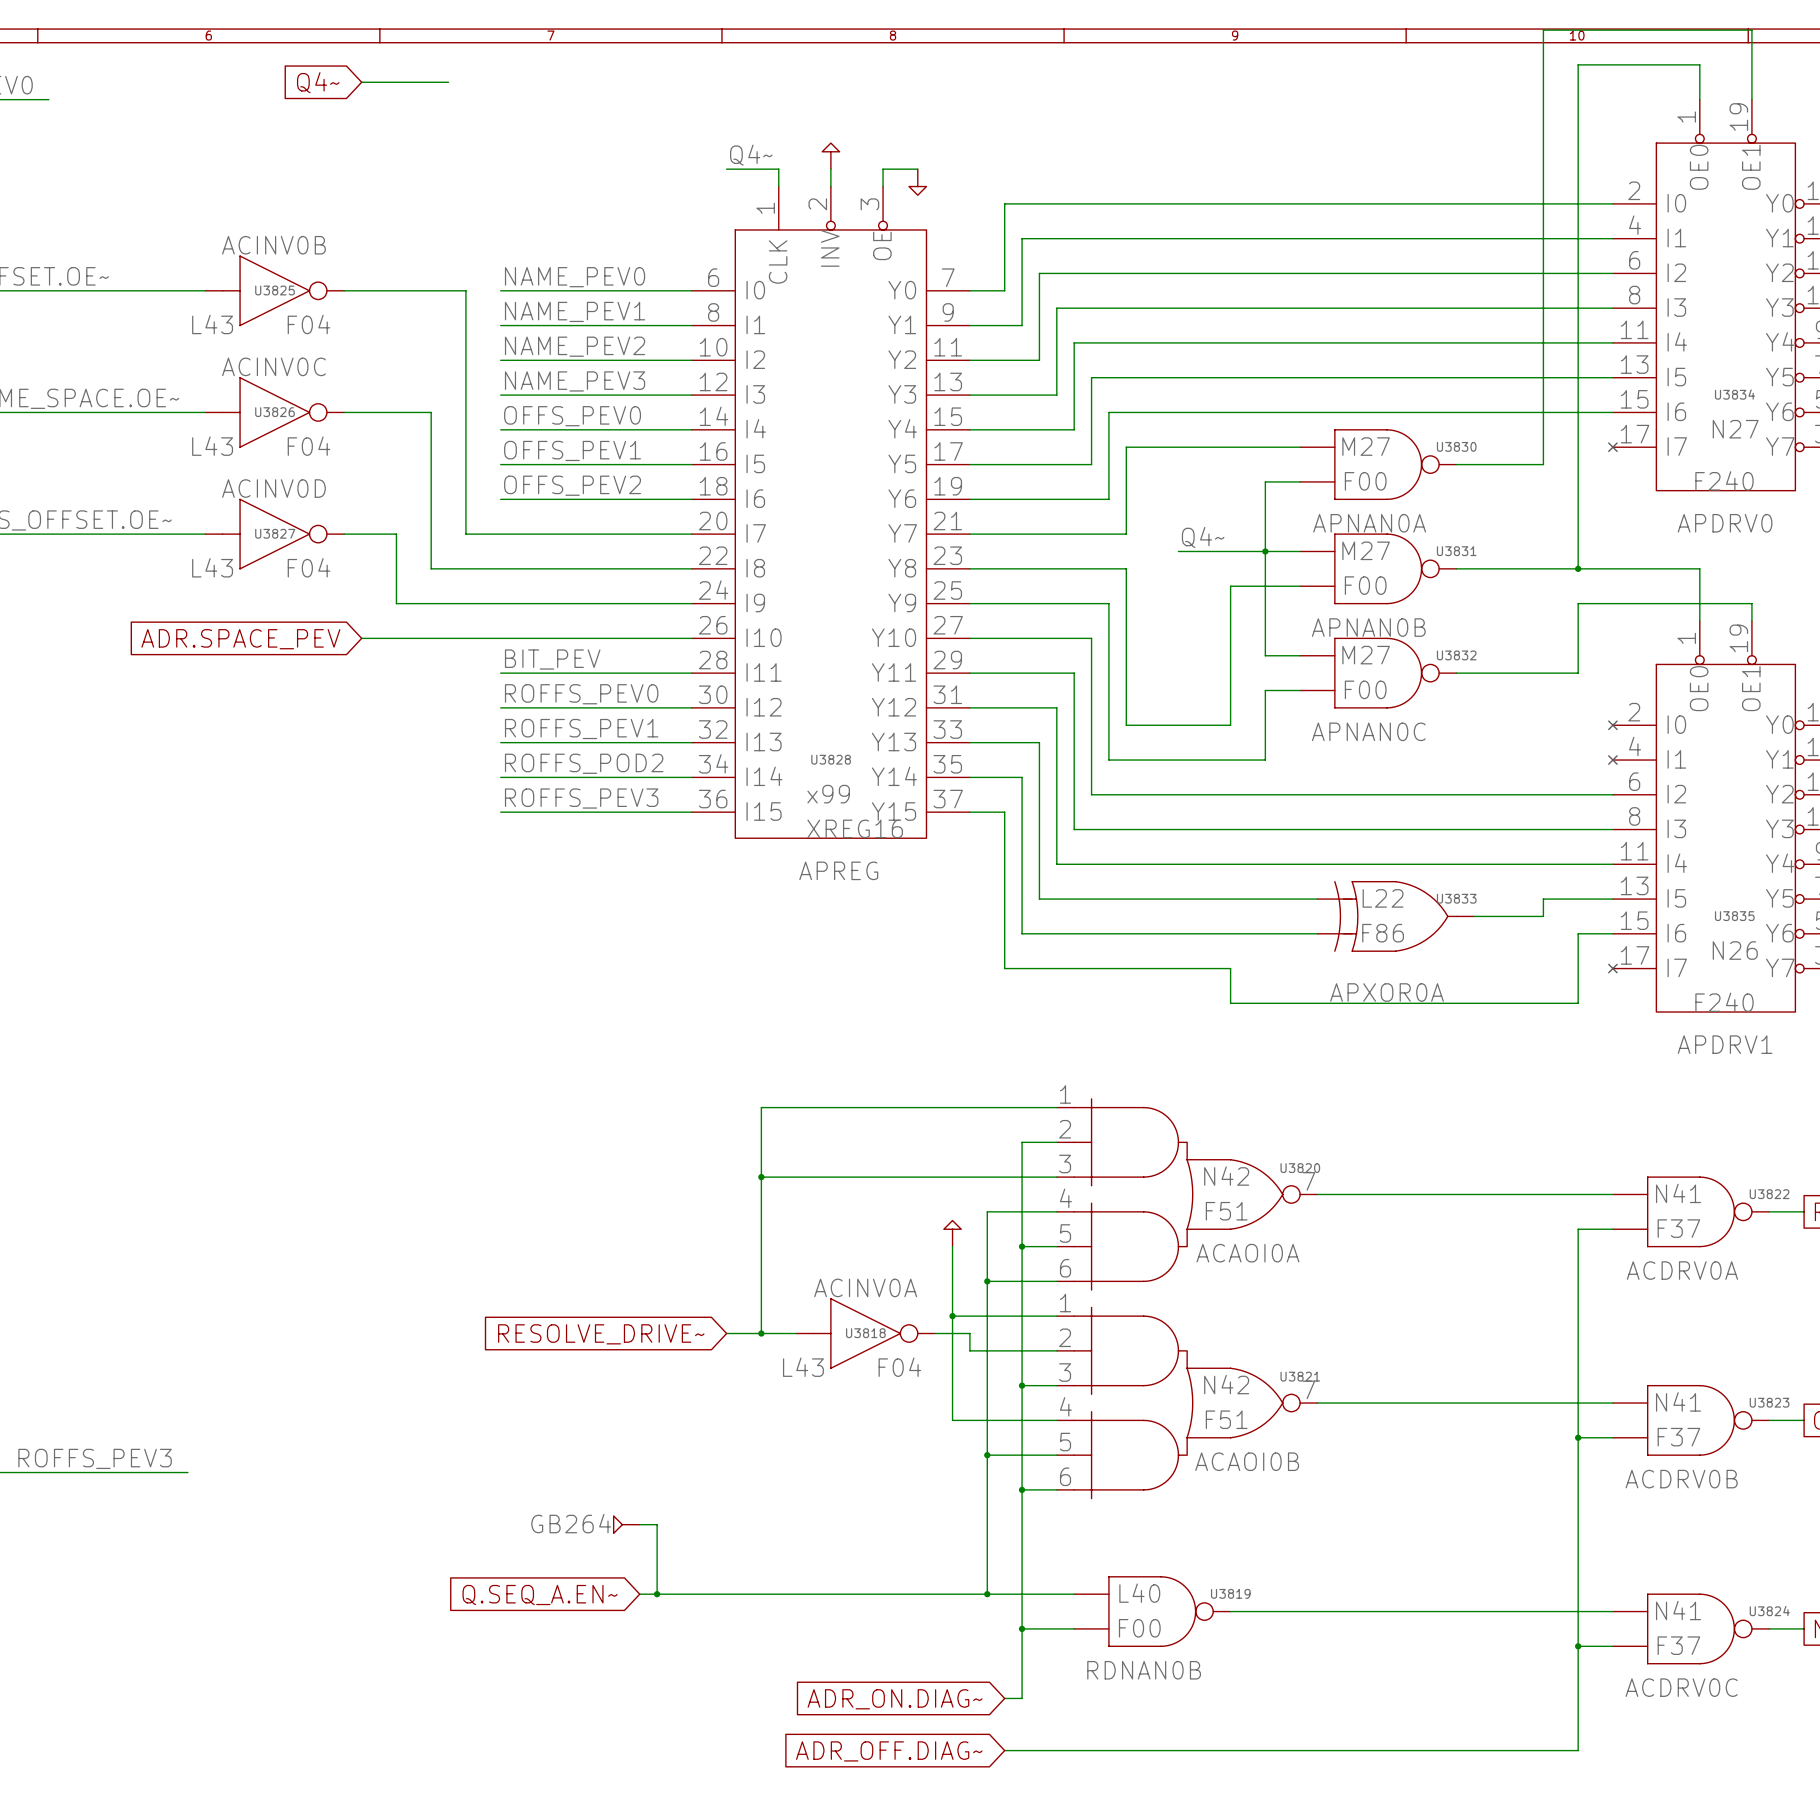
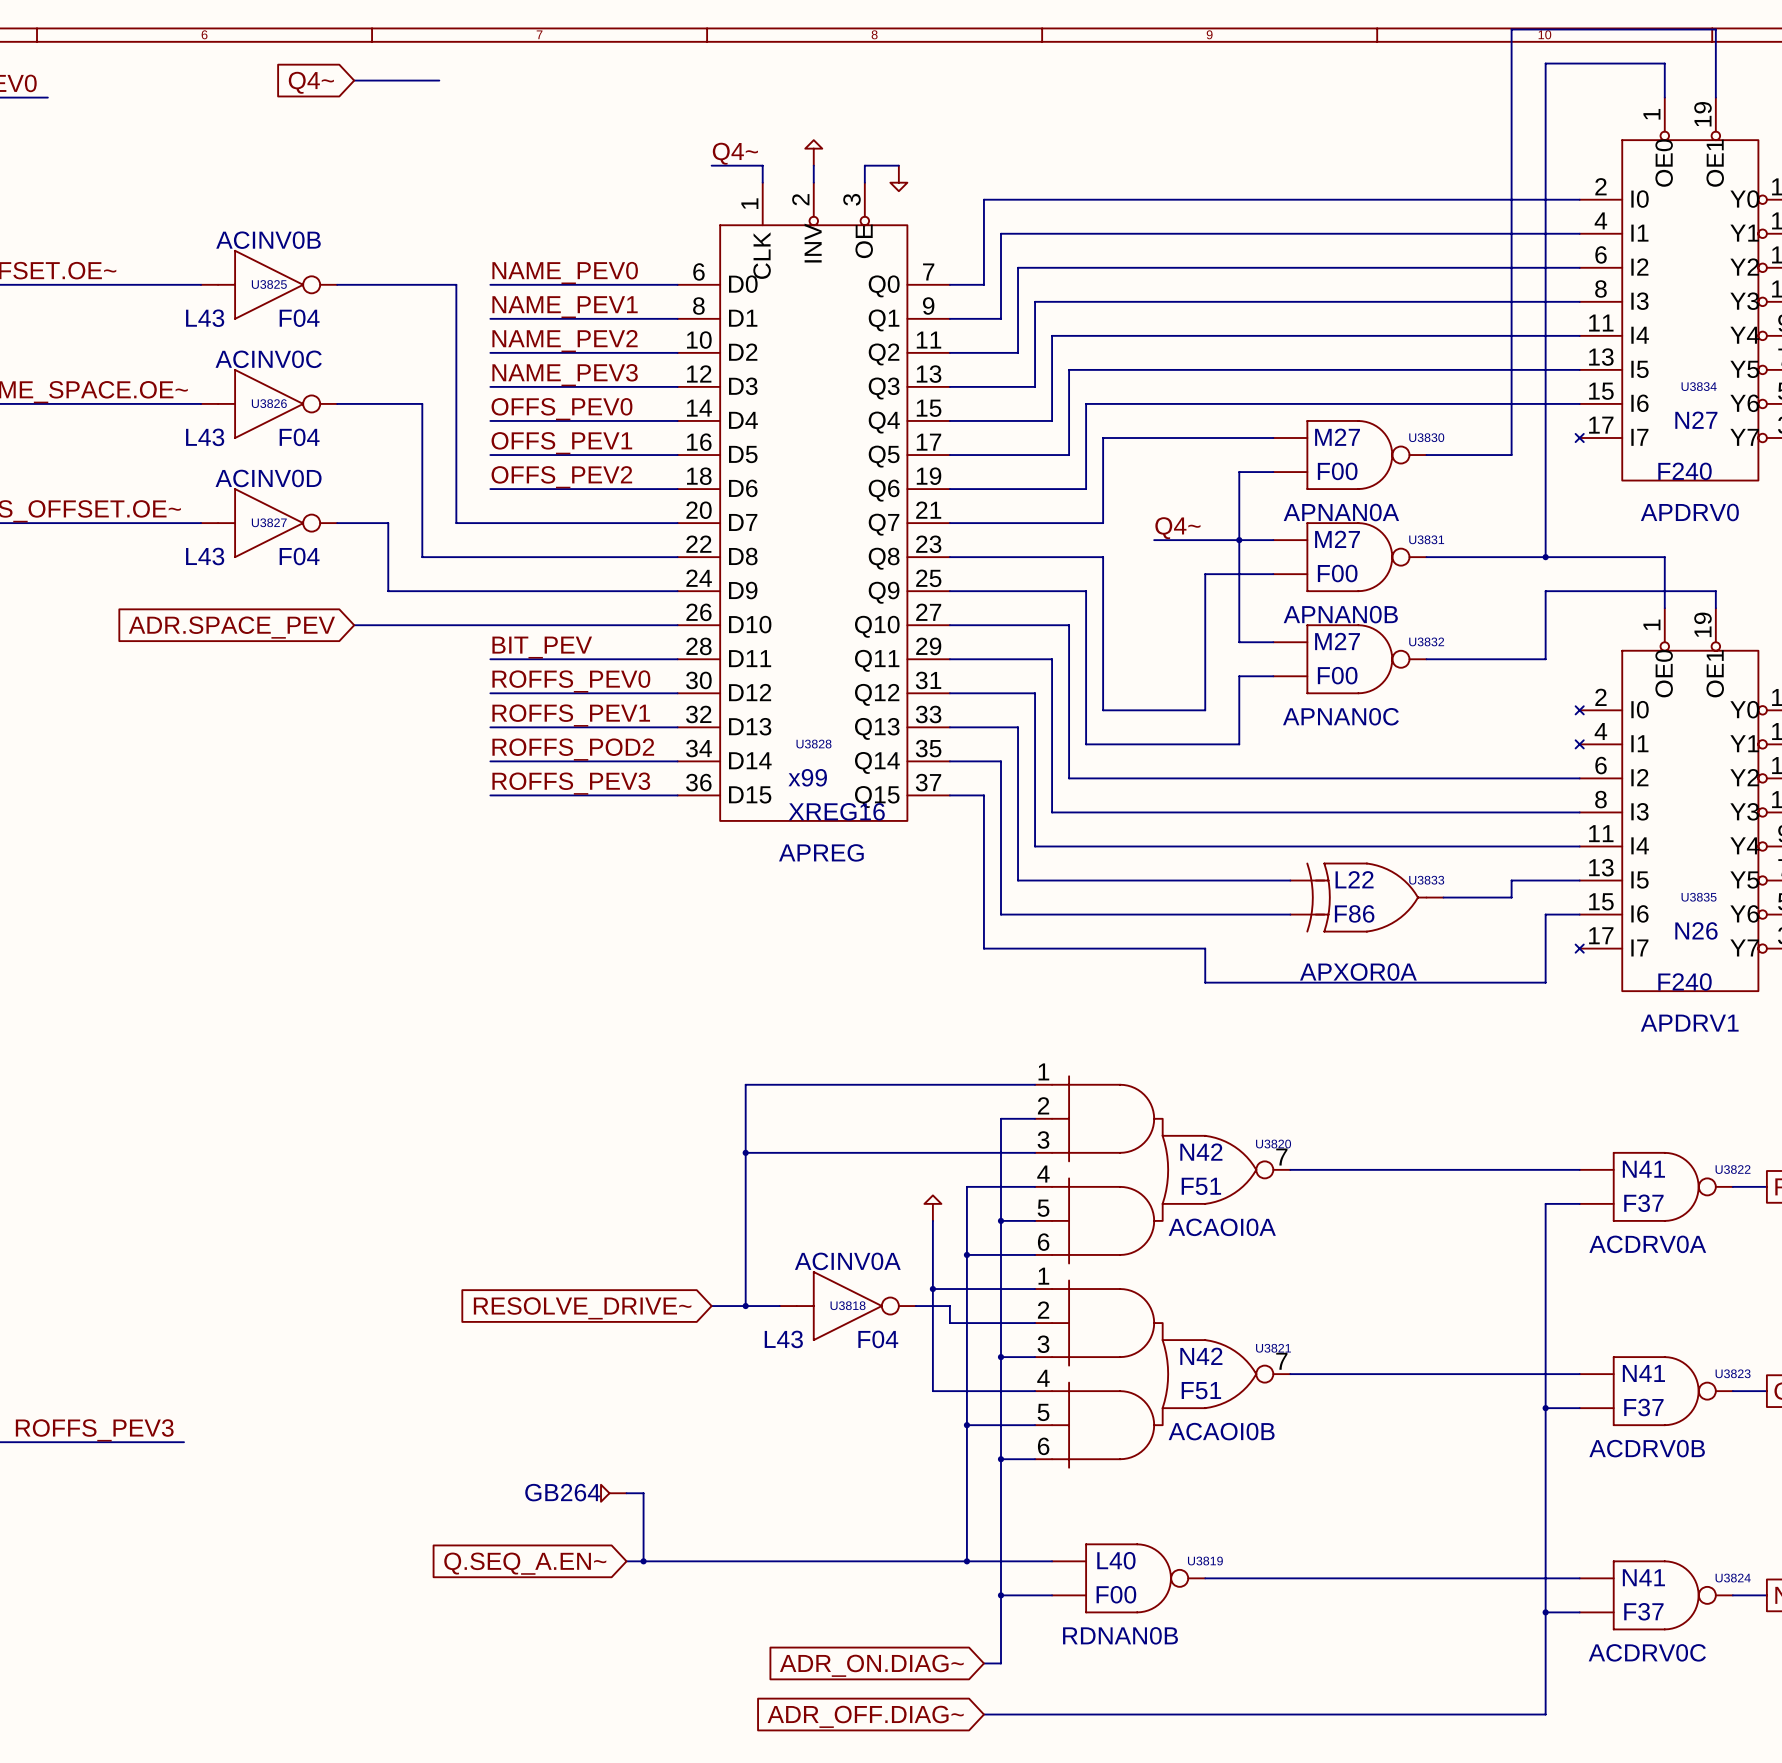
U3828 symbol: [691, 186, 970, 839] -> [677, 182, 950, 821]

